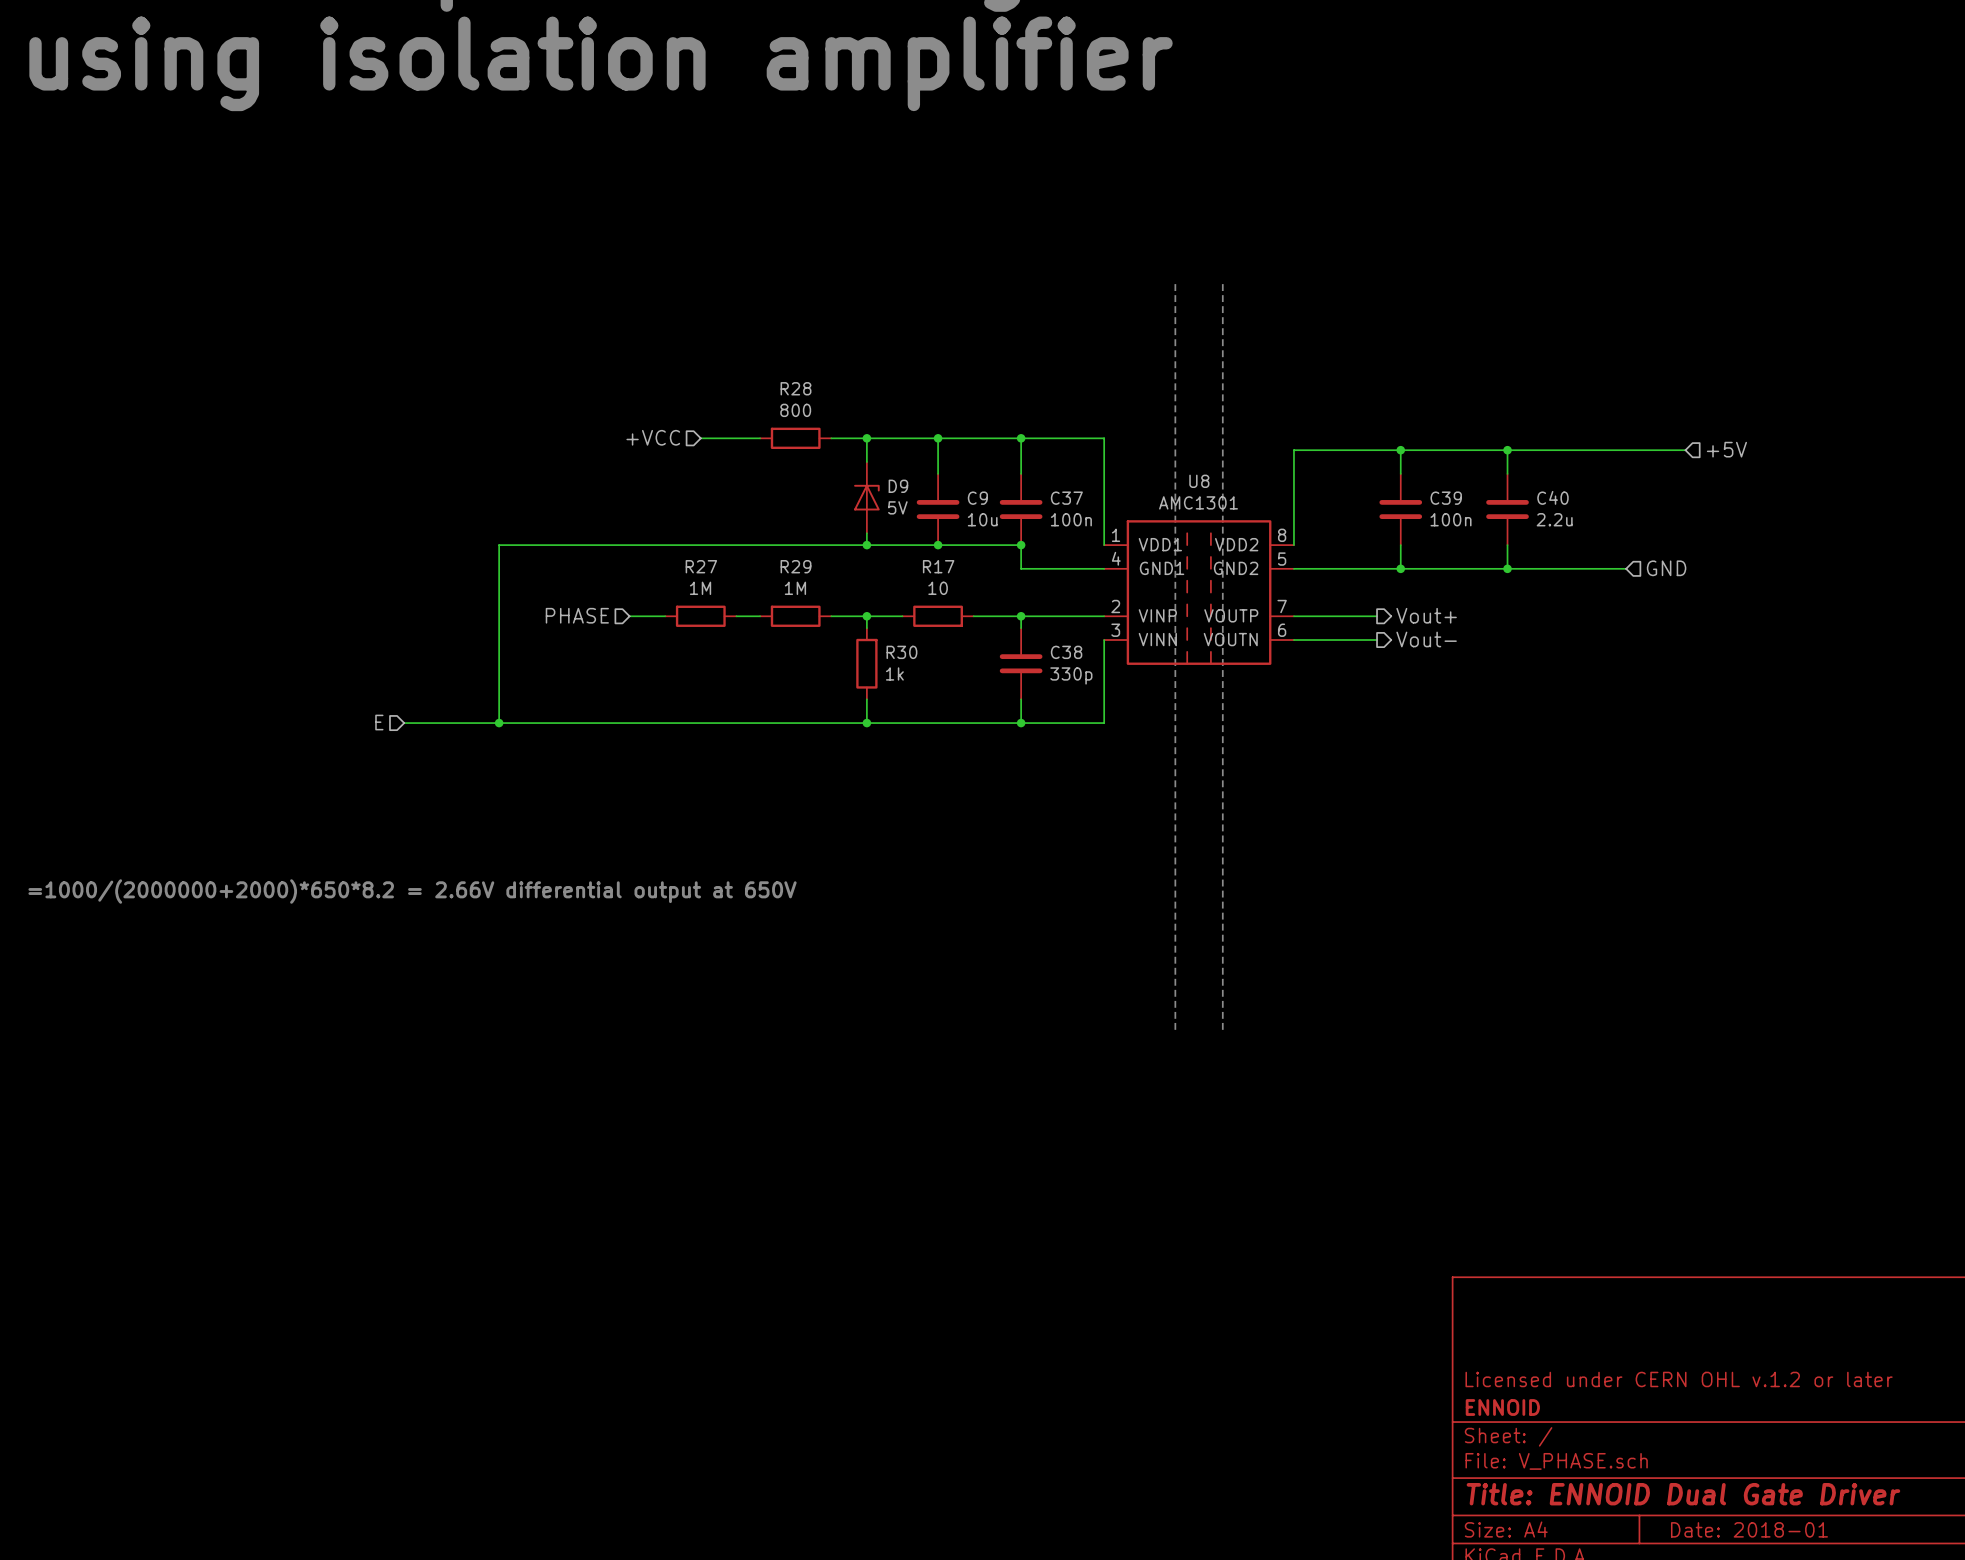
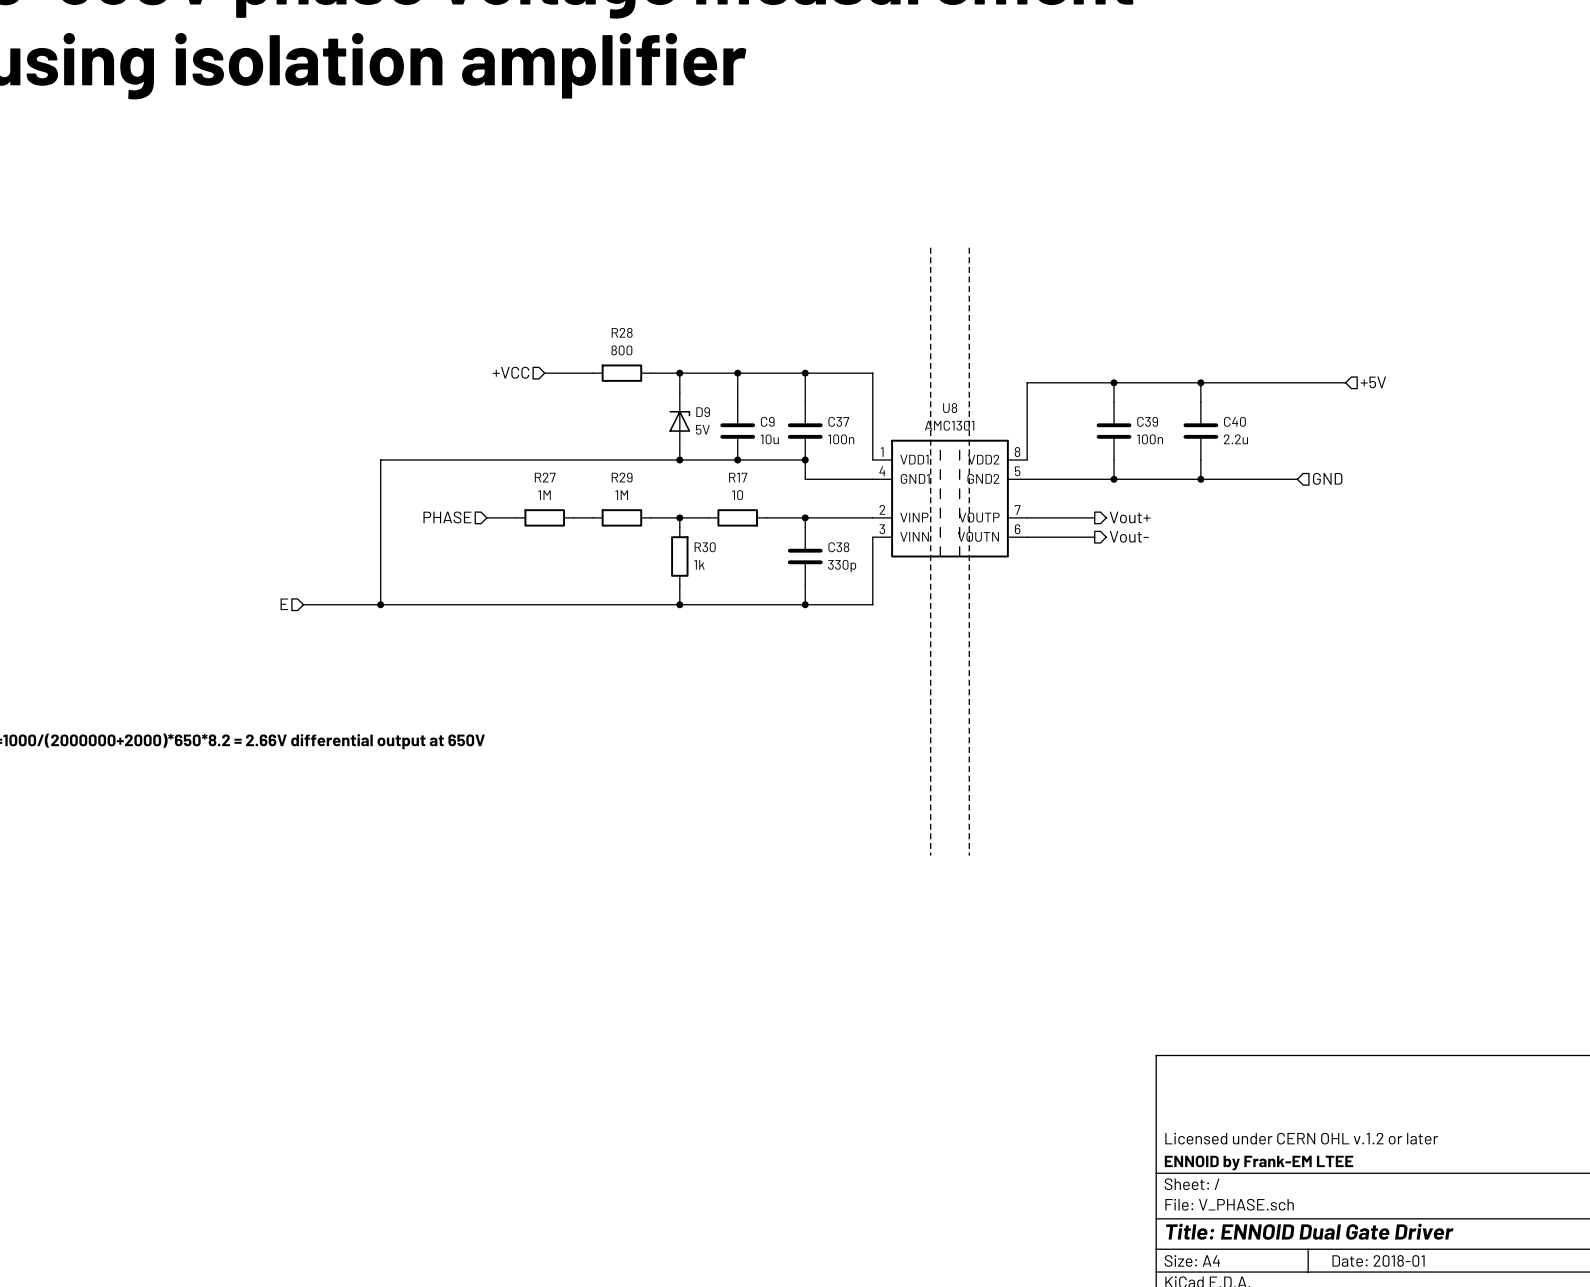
title block: ENNOID (1502, 1407) -> ENNOID by Frank-EM LTEE (1259, 1162)

